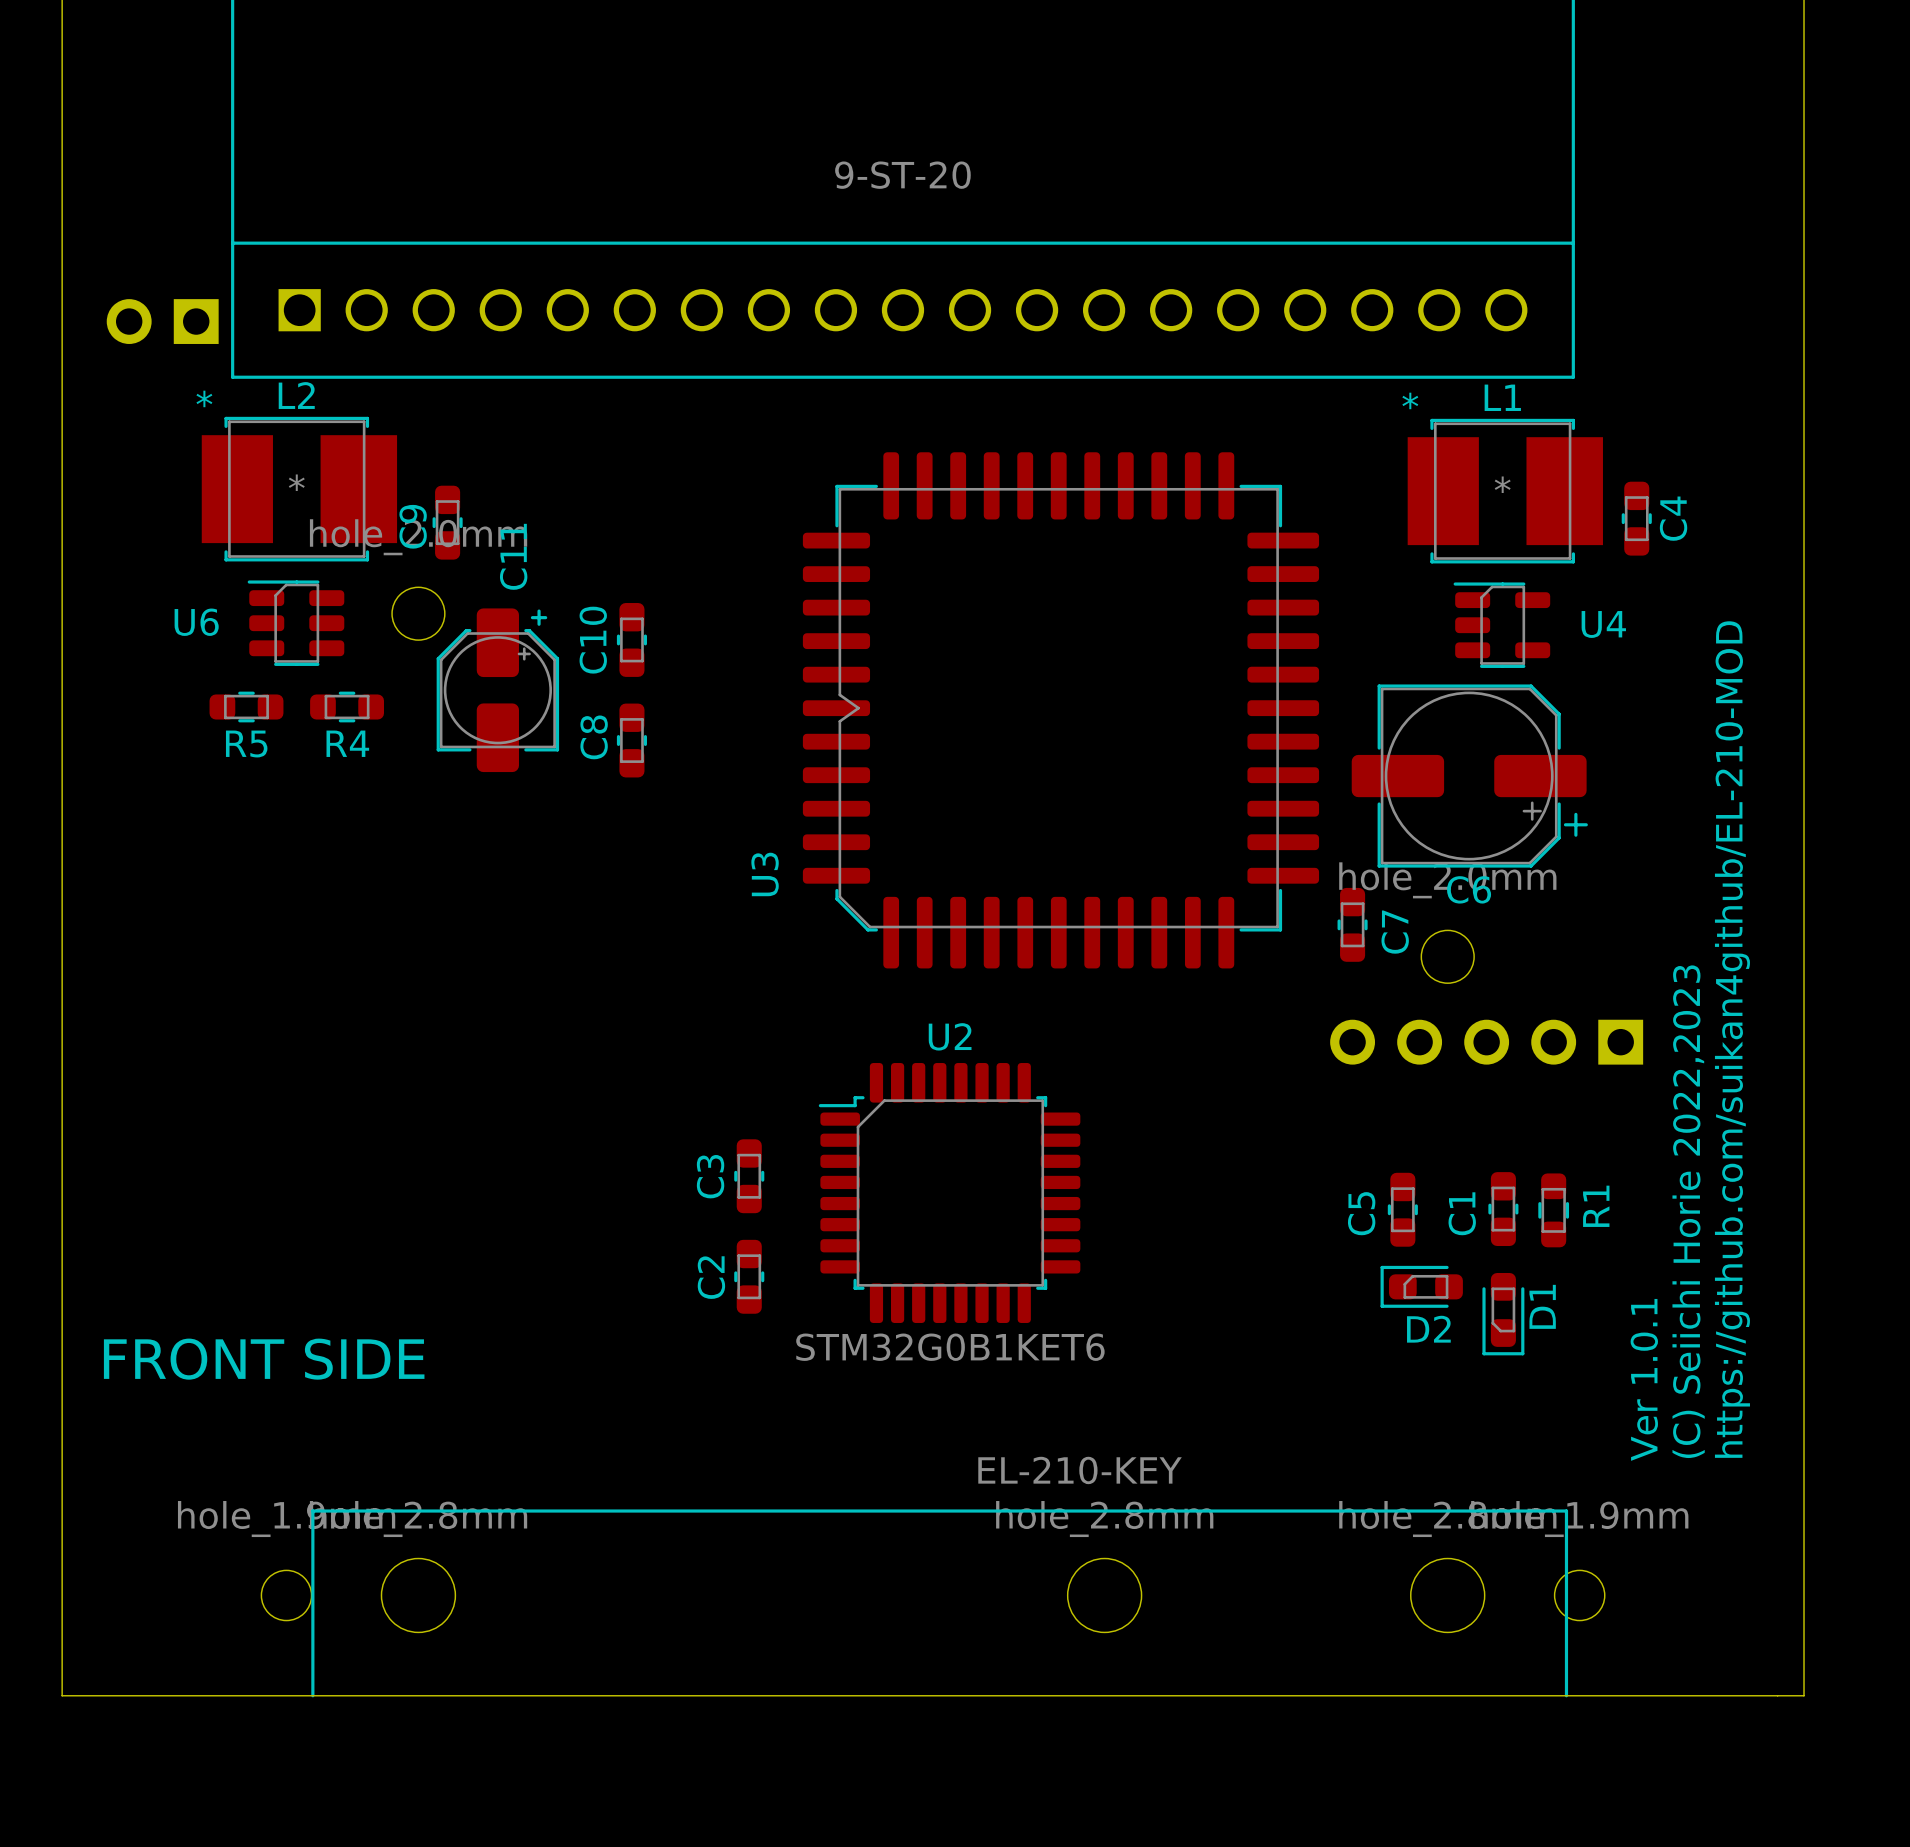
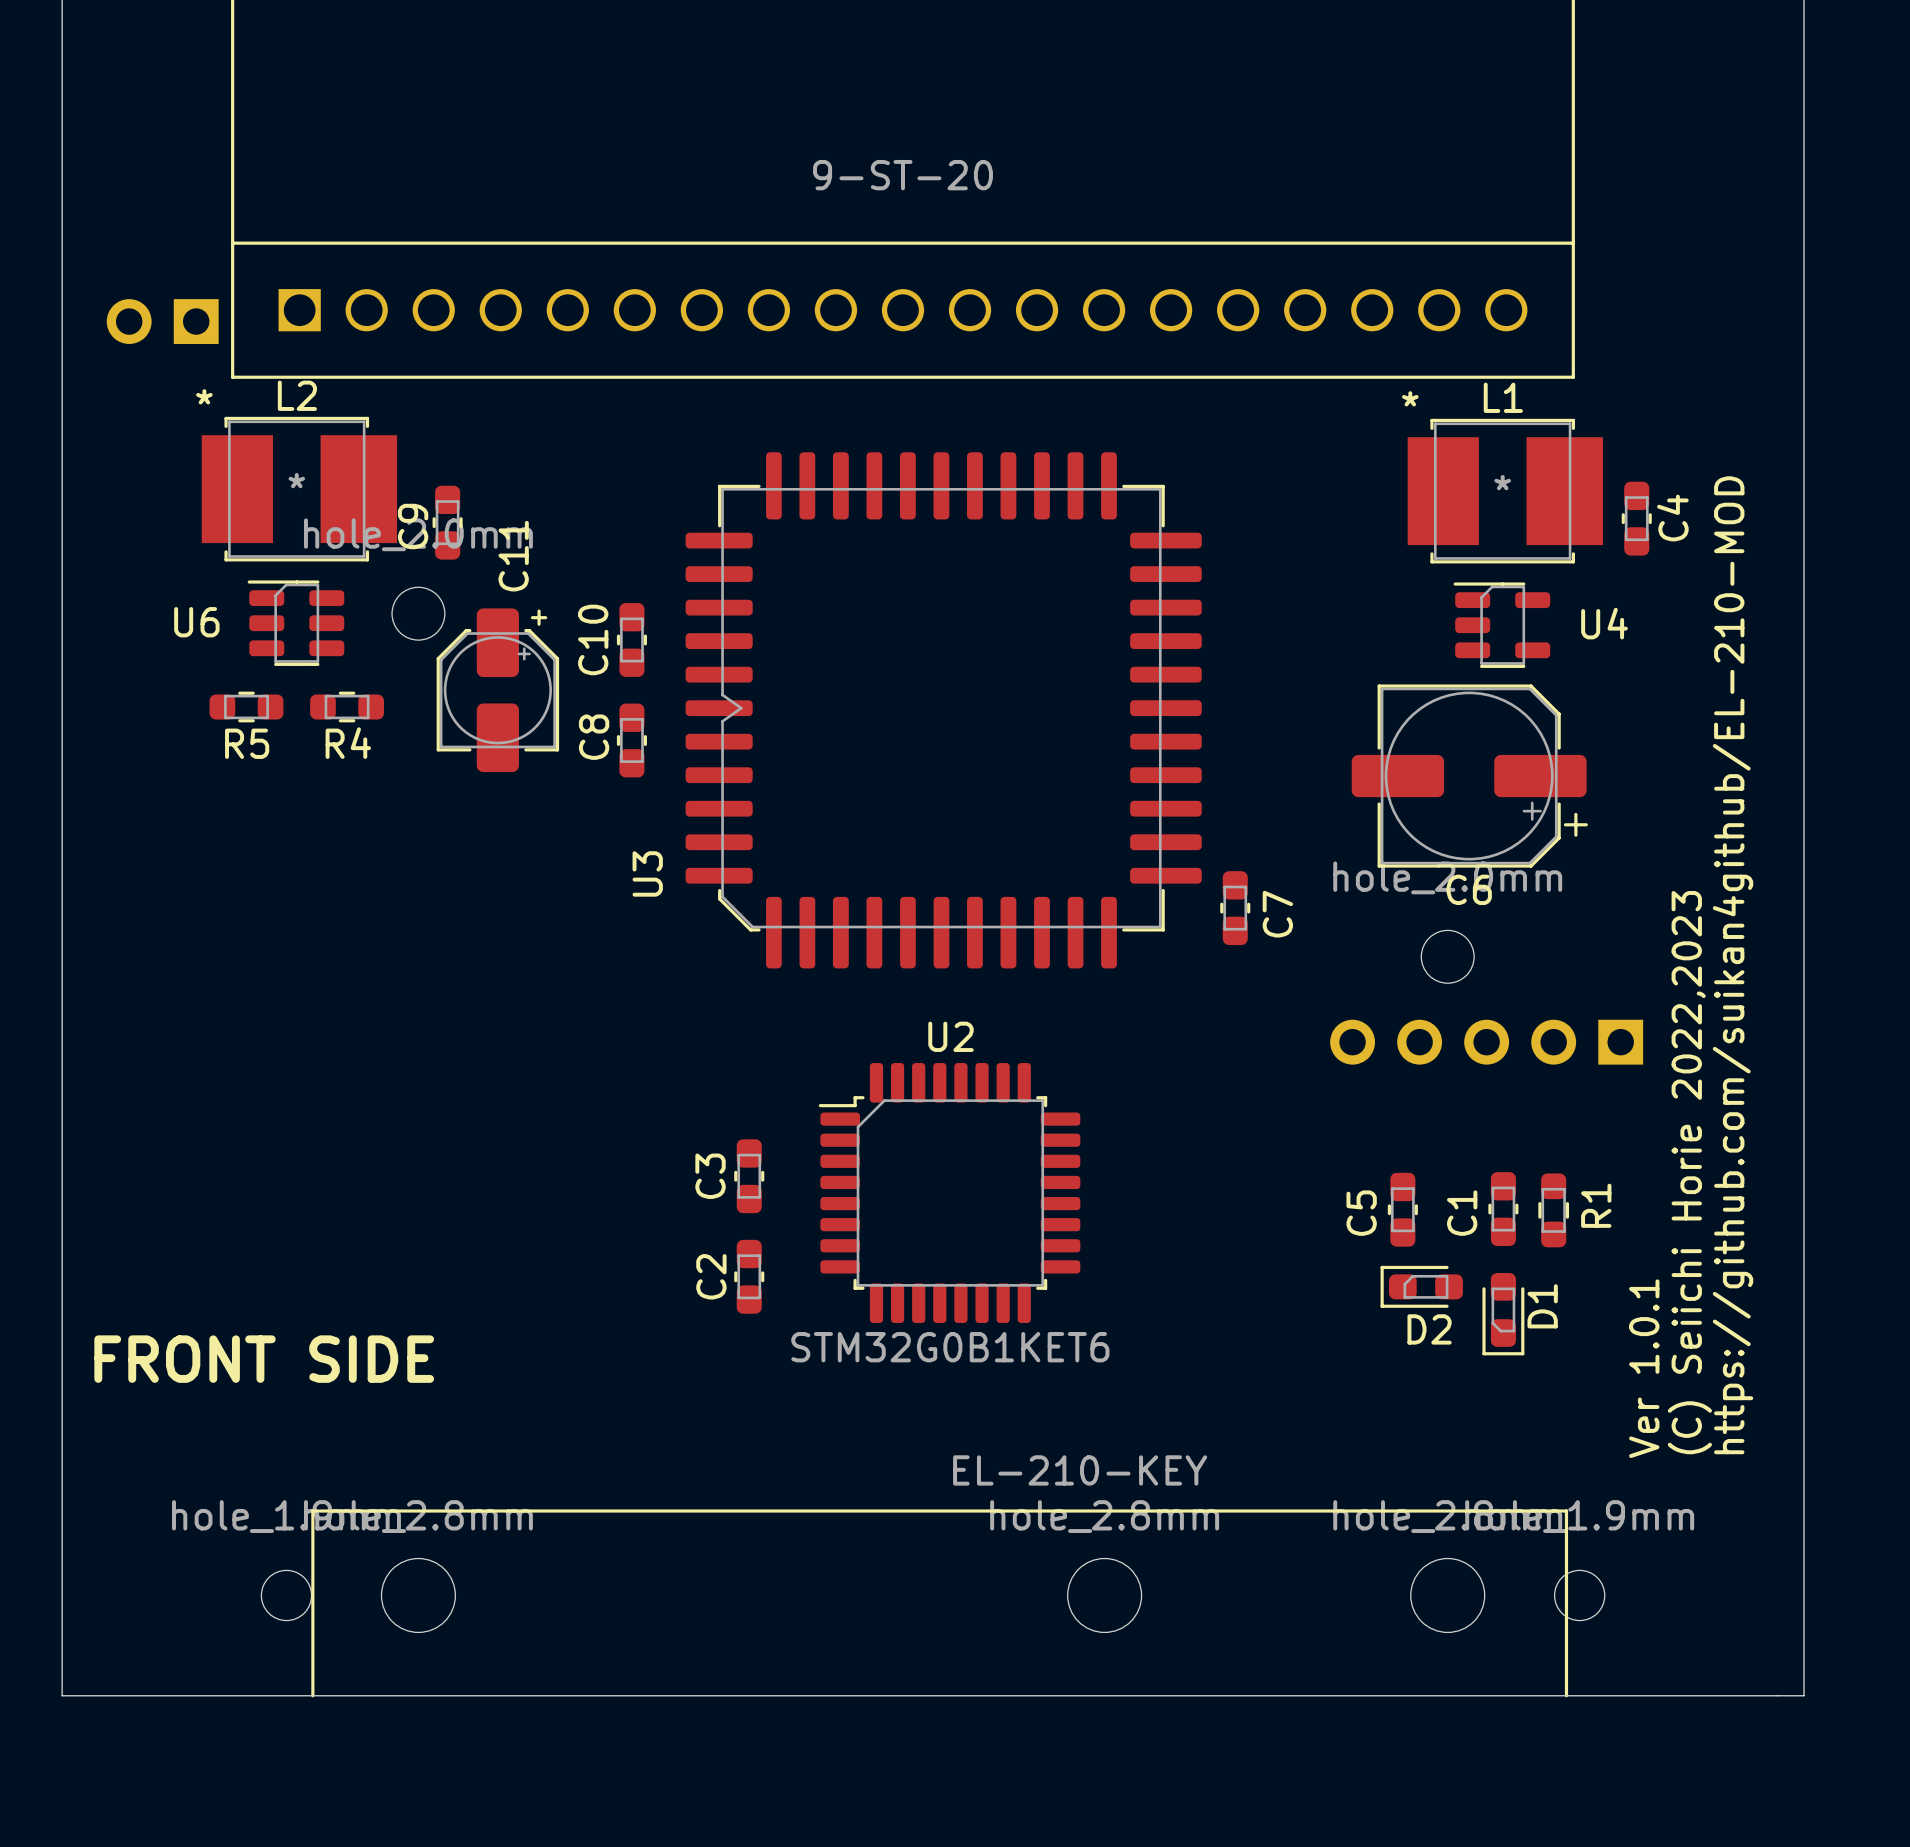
U3 position: (1060, 710) -> (943, 710)
C7 position: (1352, 924) -> (1235, 908)

